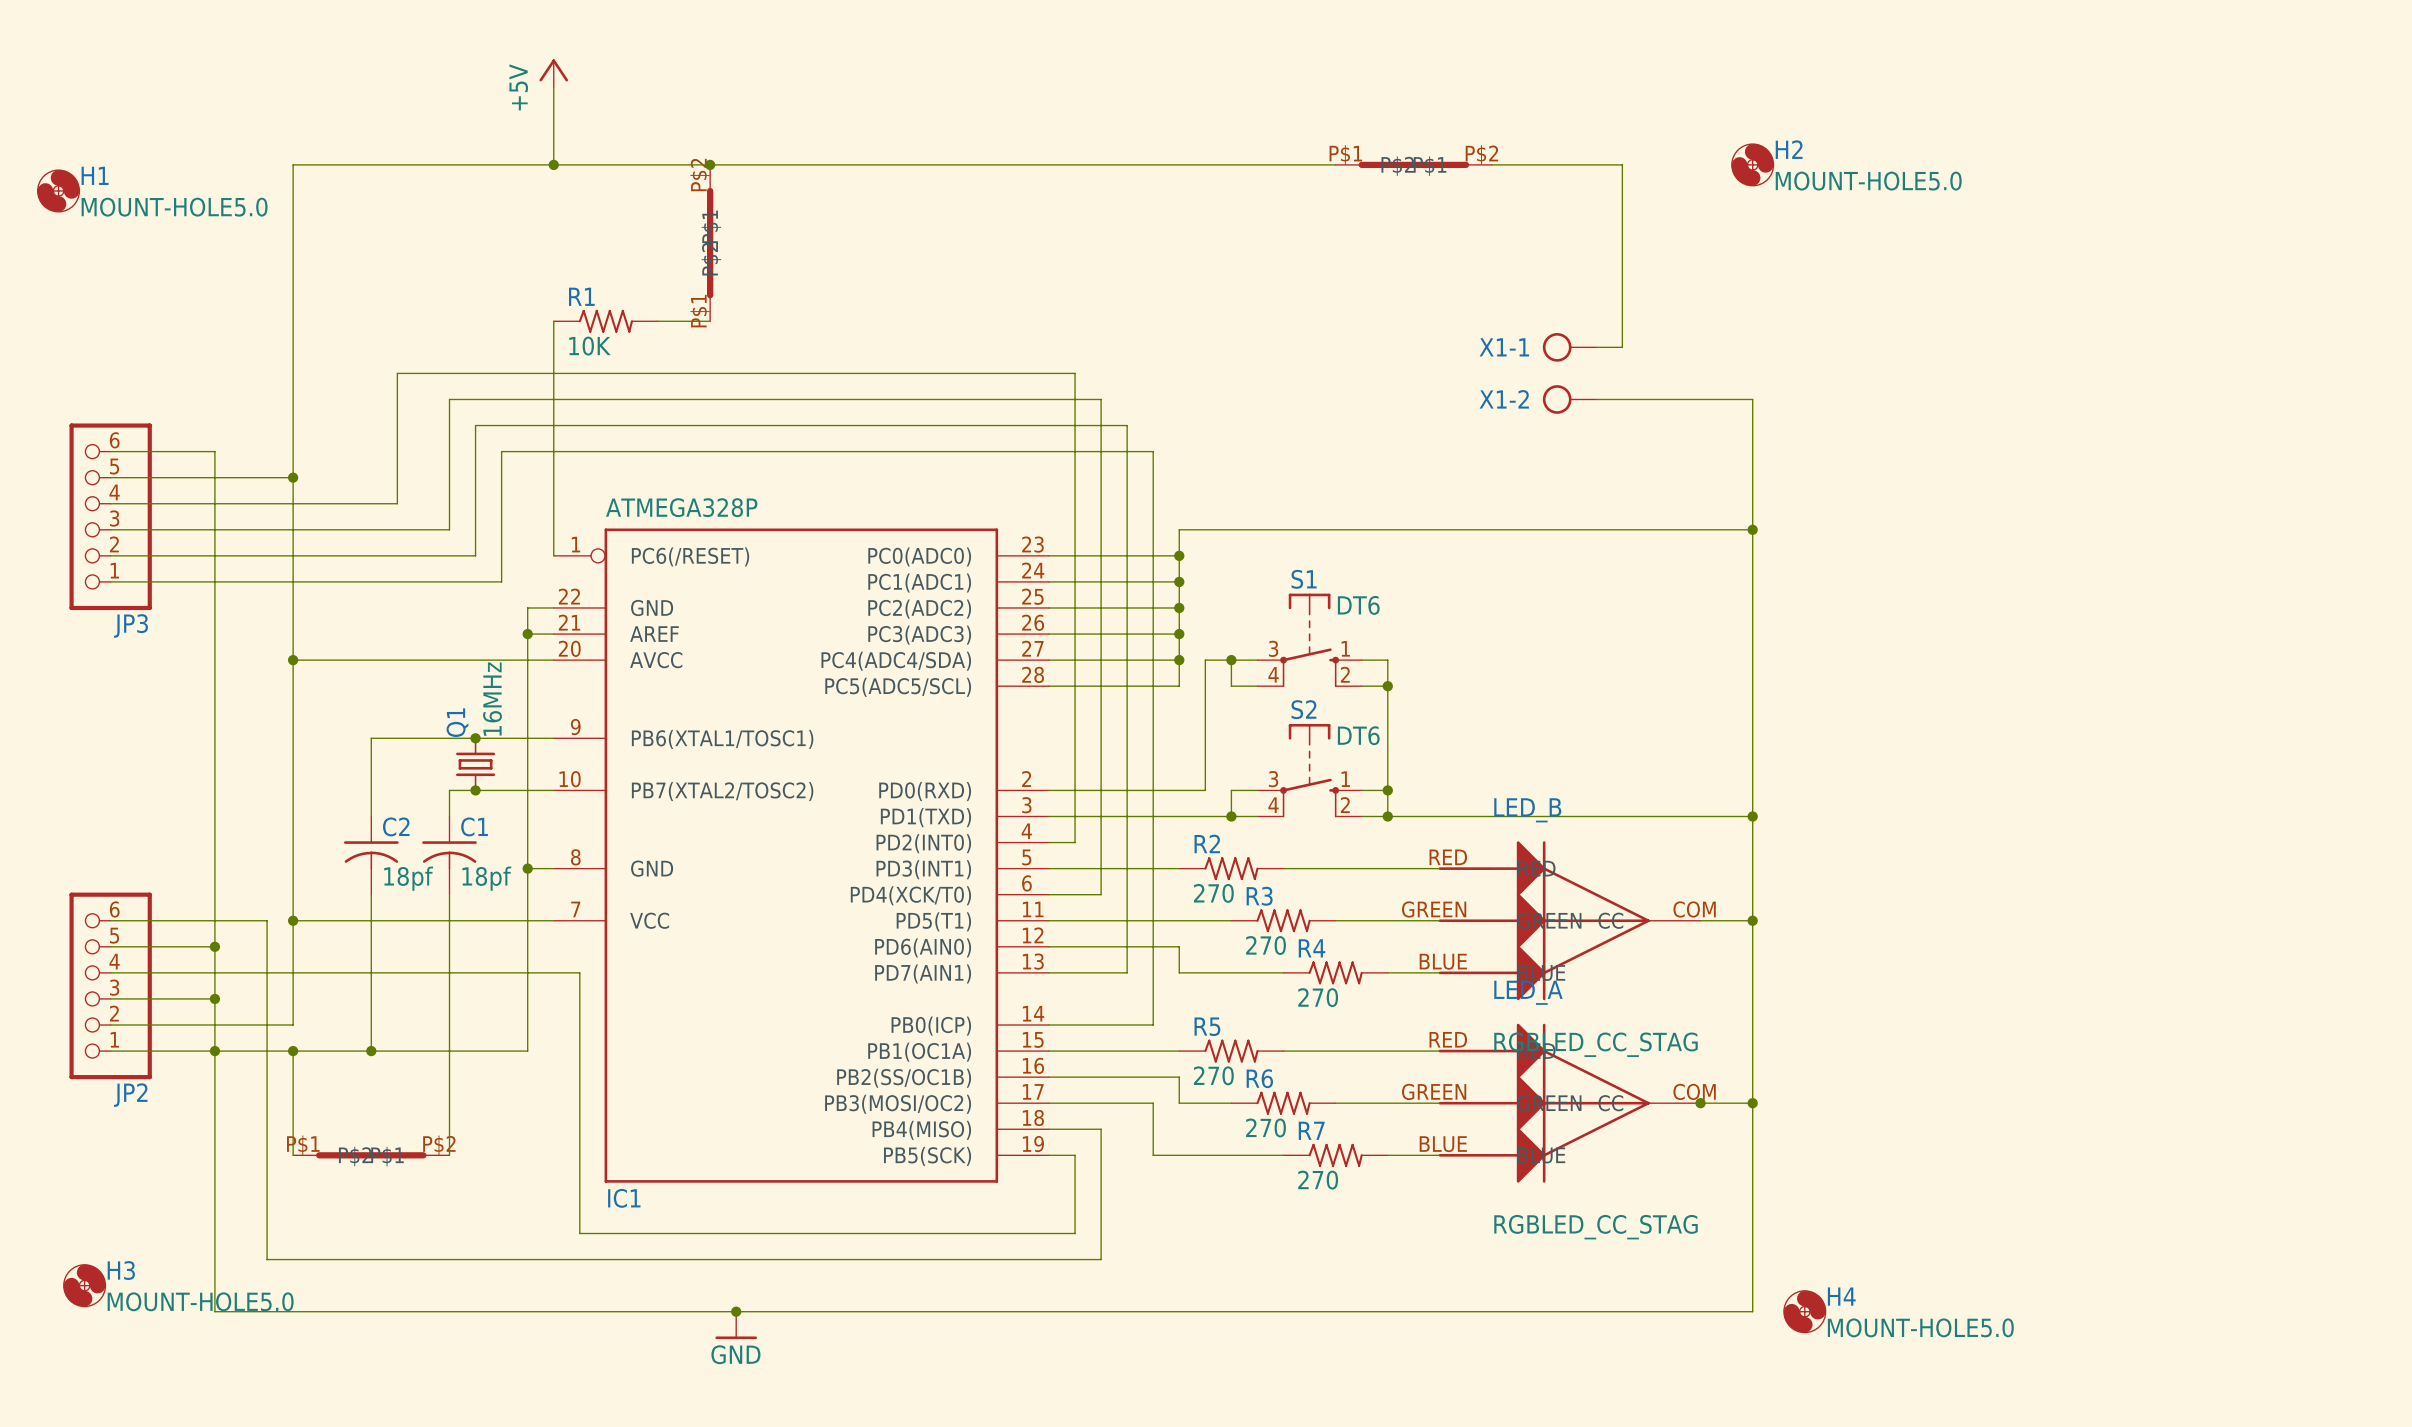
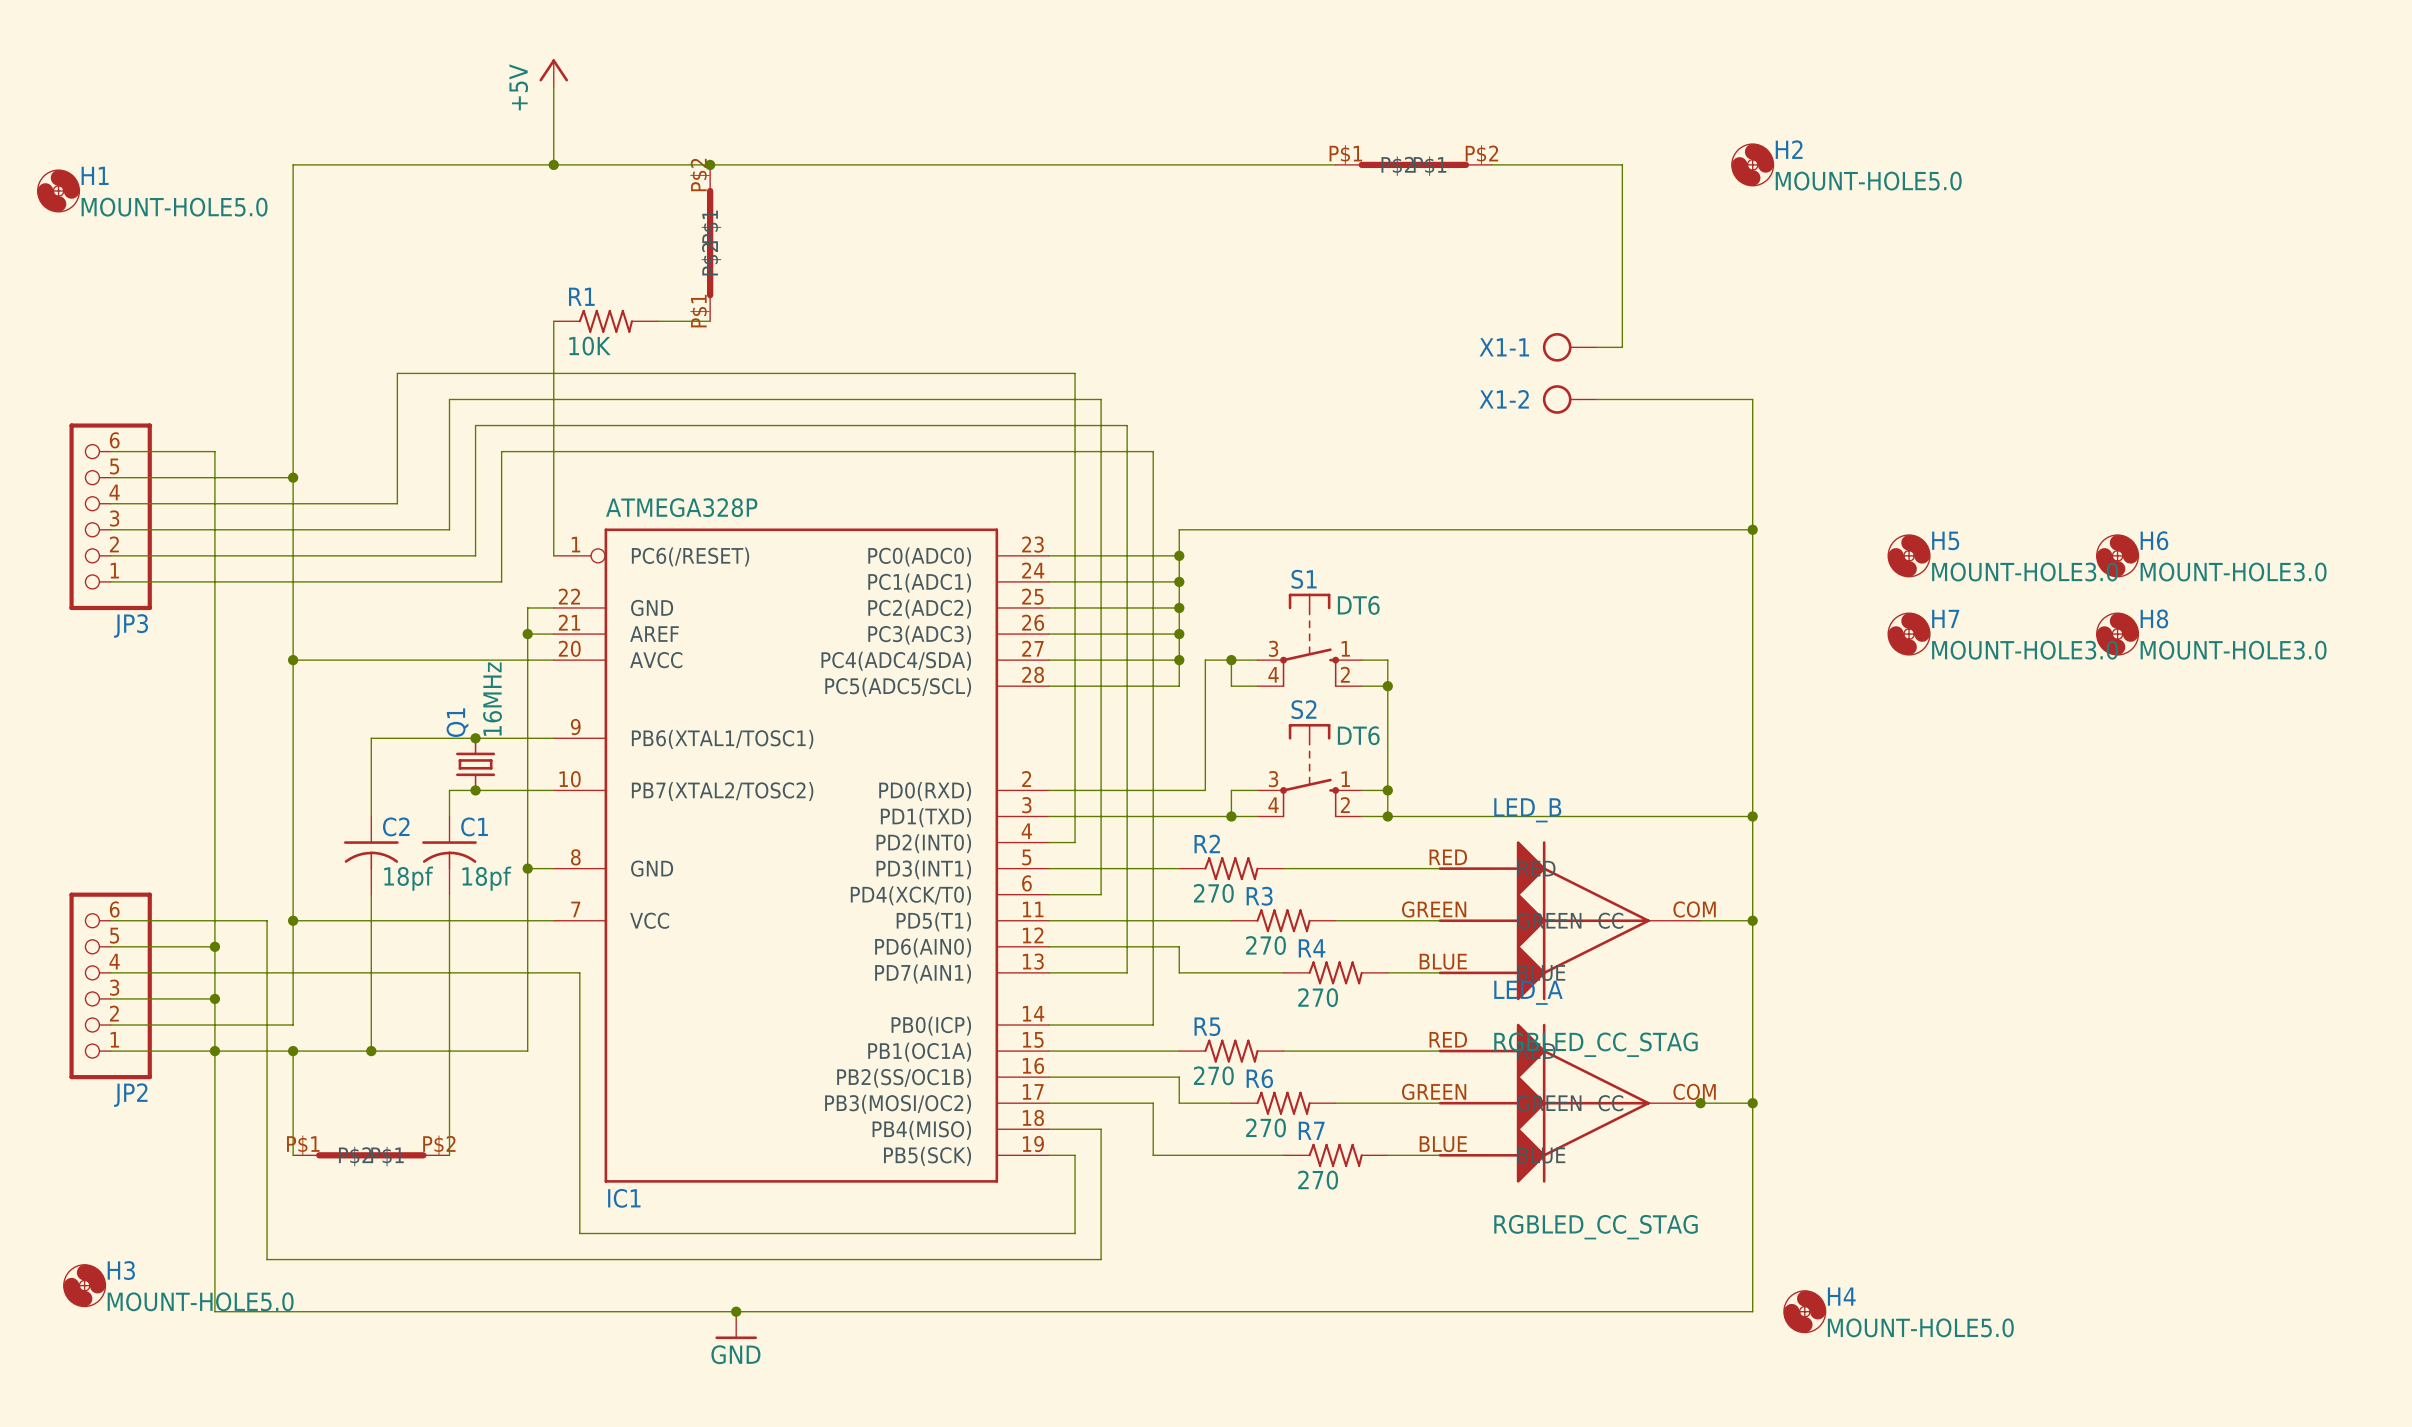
H5: none -> MOUNT-HOLE3.0 (1909, 555)
H6: none -> MOUNT-HOLE3.0 (2117, 555)
H7: none -> MOUNT-HOLE3.0 (1909, 634)
H8: none -> MOUNT-HOLE3.0 (2117, 634)

